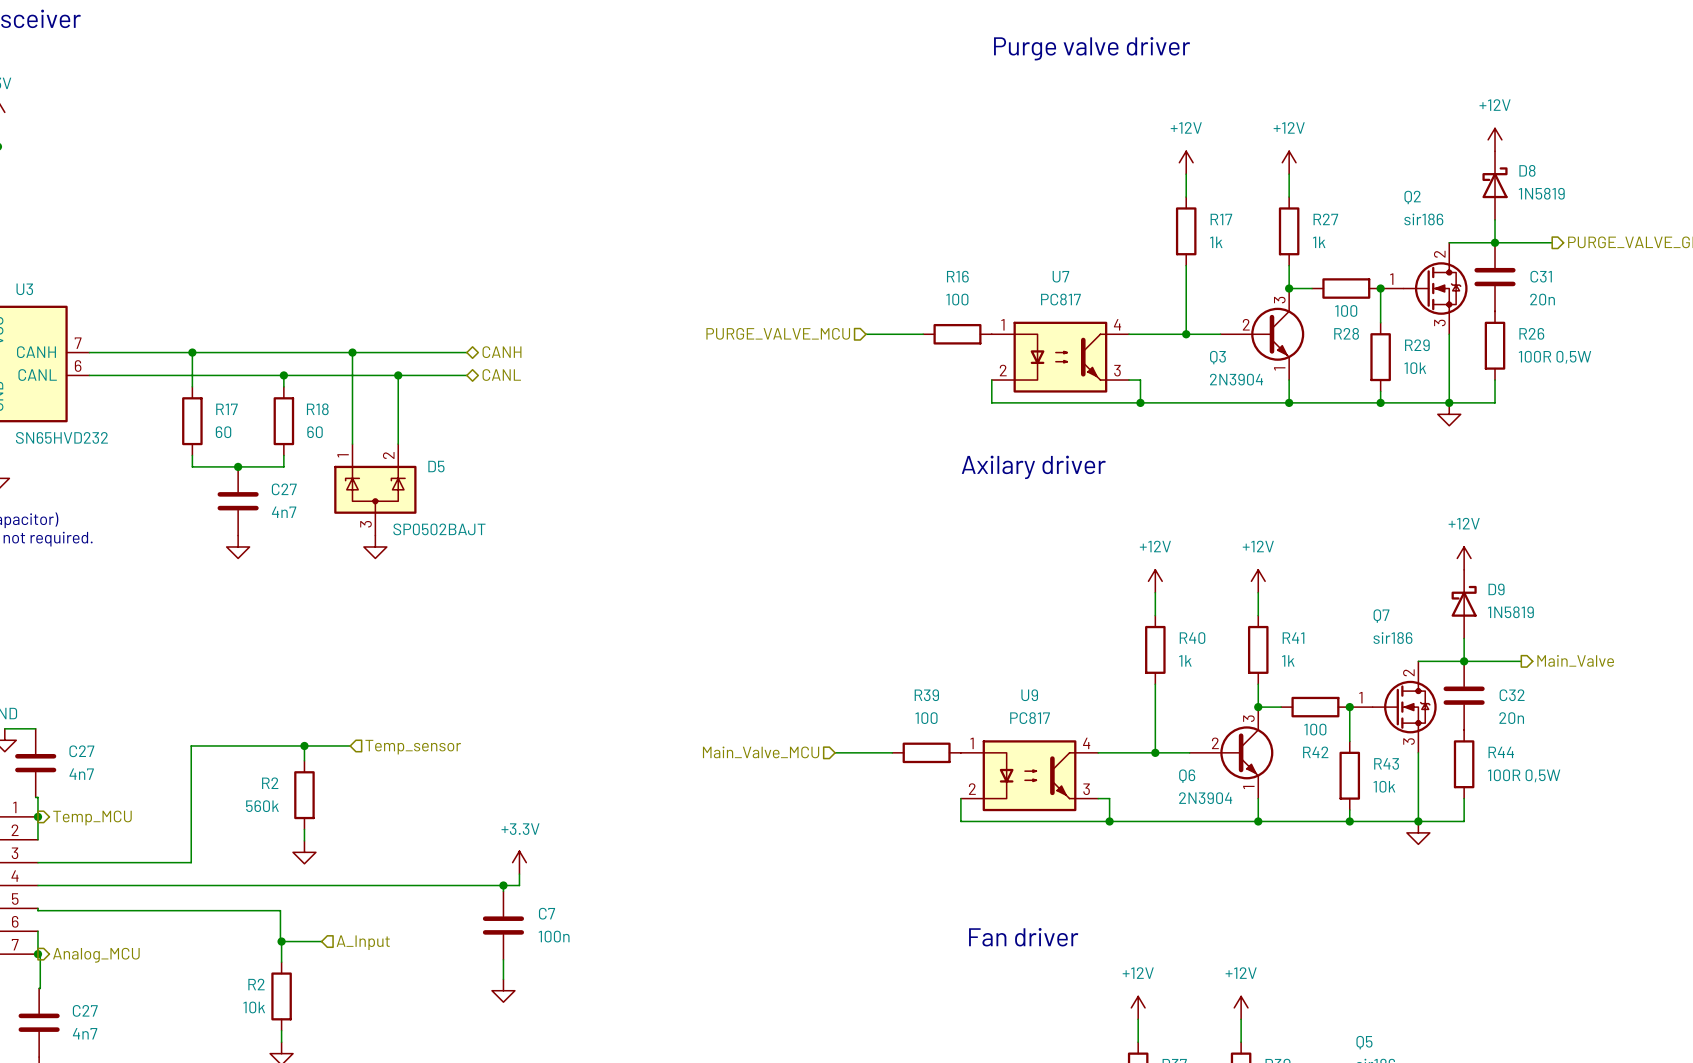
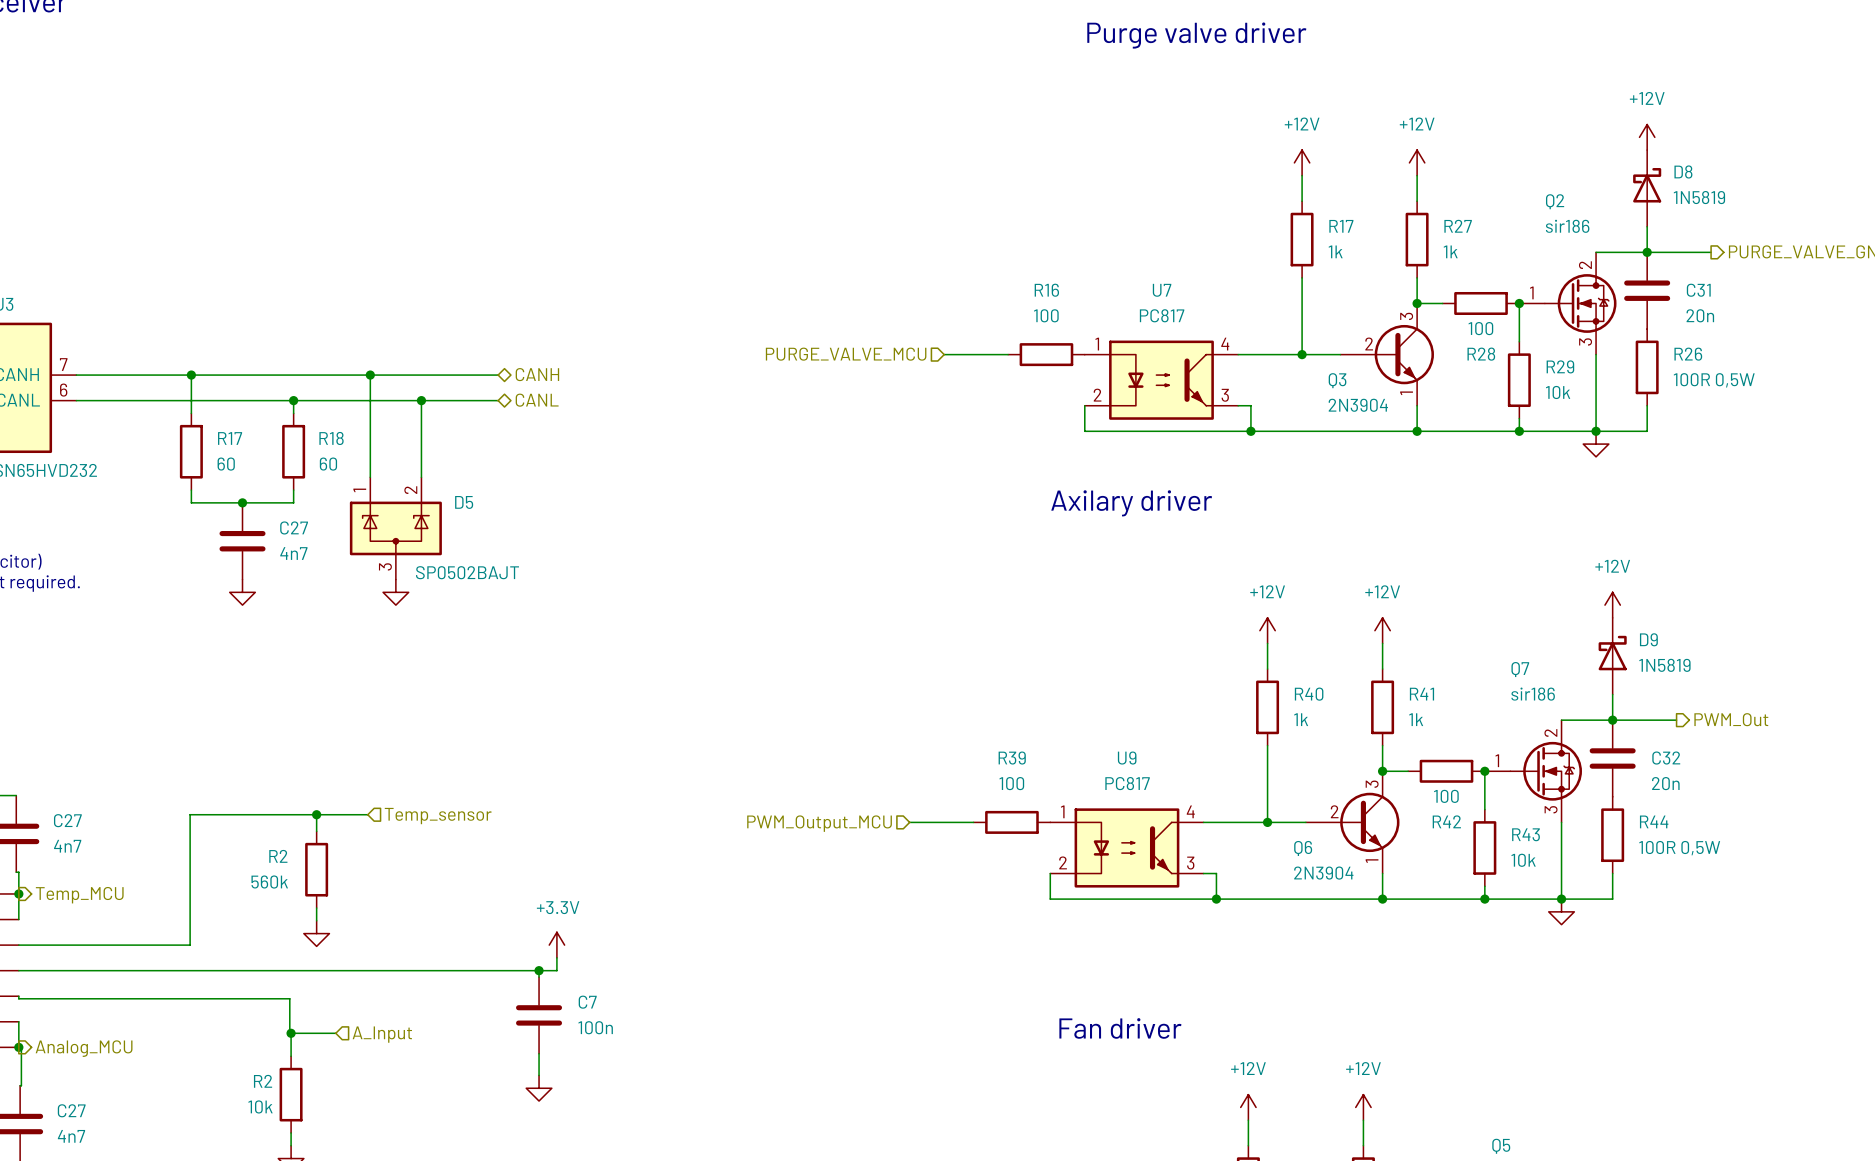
hierarchical label: Main_Valve (1575, 660) -> PWM_Out (1731, 719)
hierarchical label: Main_Valve_MCU (761, 752) -> PWM_Output_MCU (819, 823)

